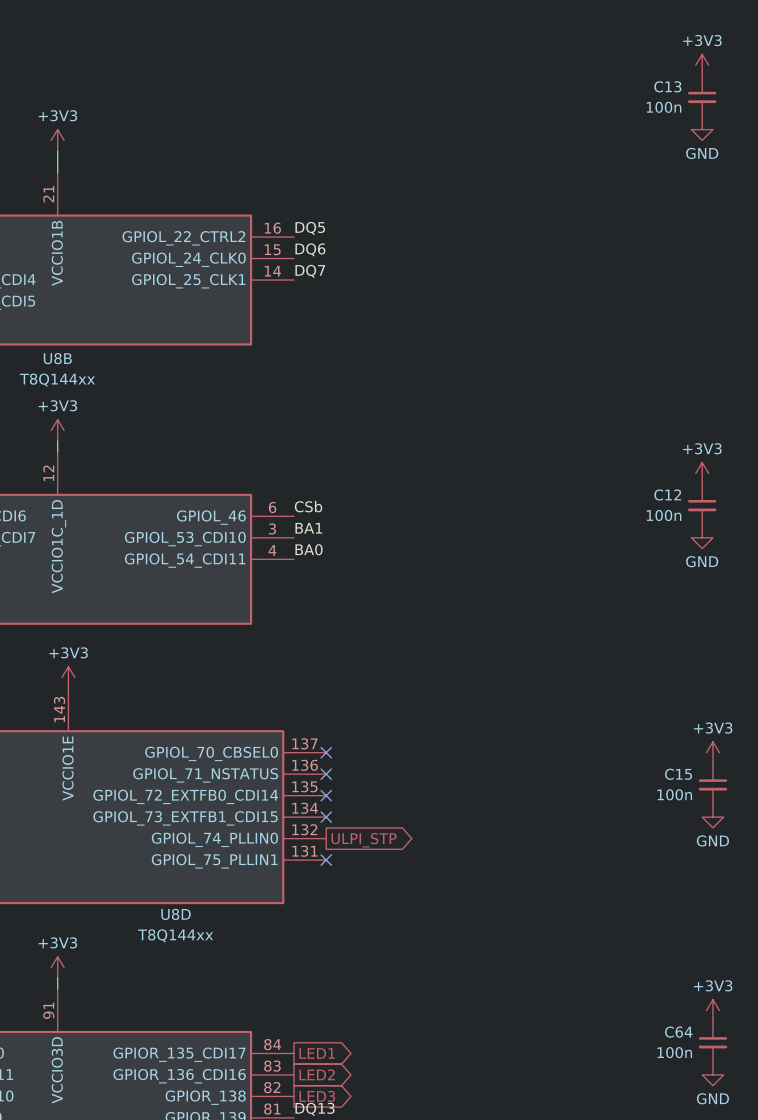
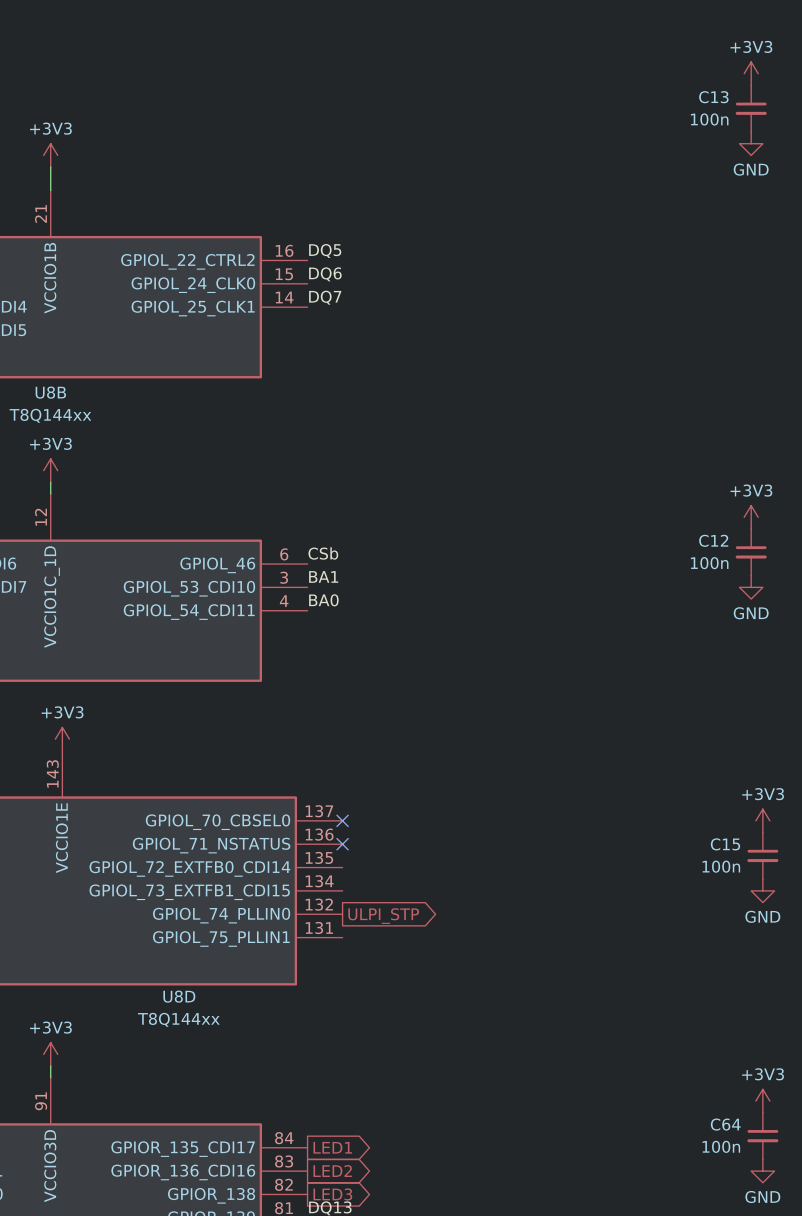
no-connect mark: (326, 795) -> none
no-connect mark: (326, 817) -> none
no-connect mark: (326, 860) -> none

